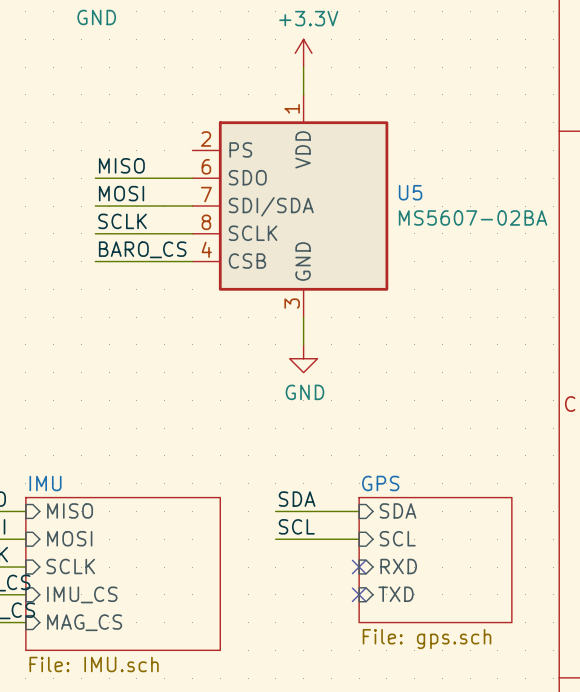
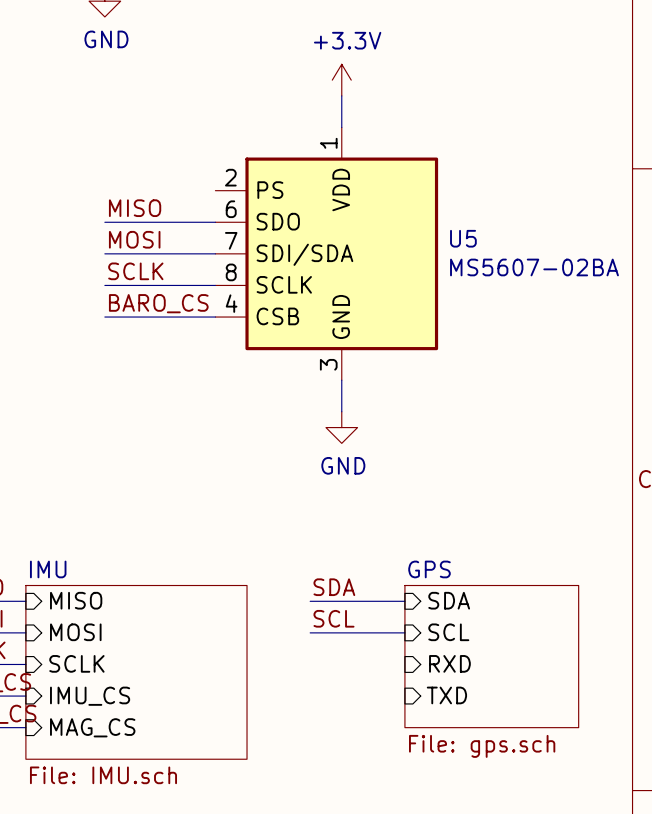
no-connect mark: (359, 567) -> none
no-connect mark: (359, 594) -> none

